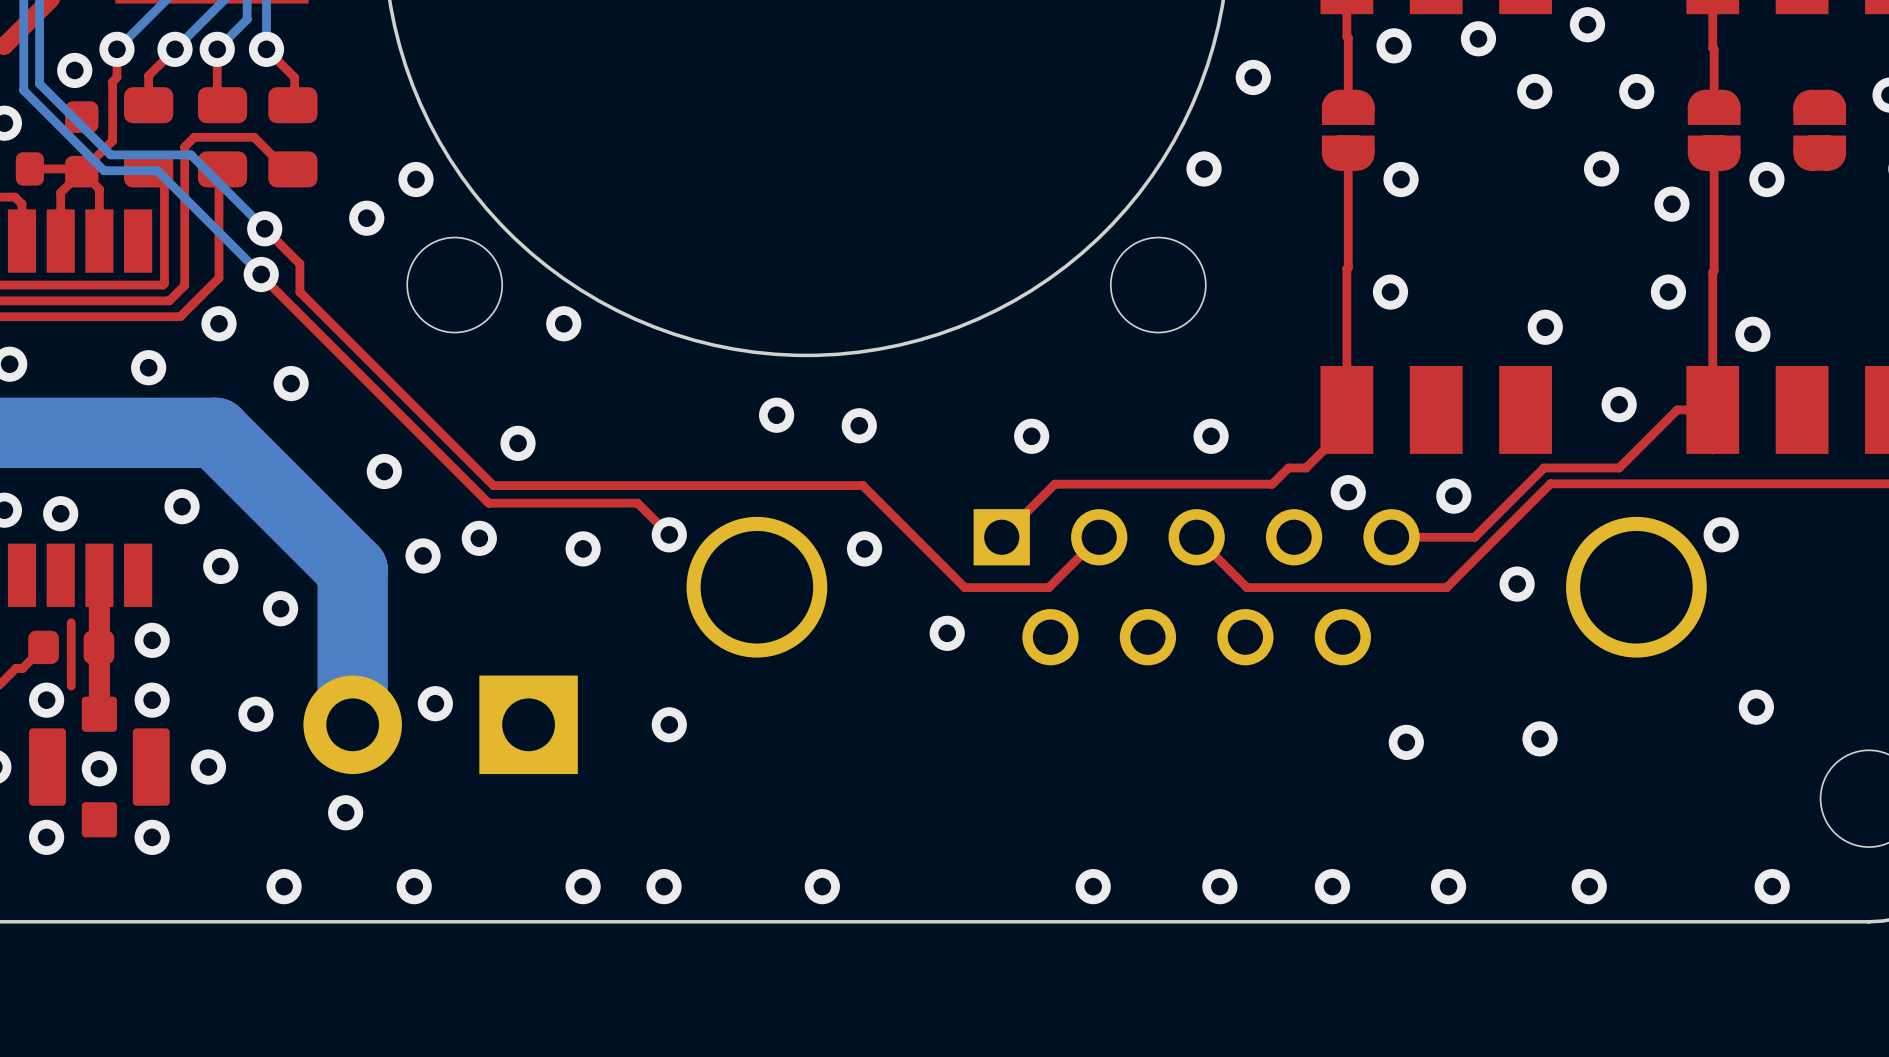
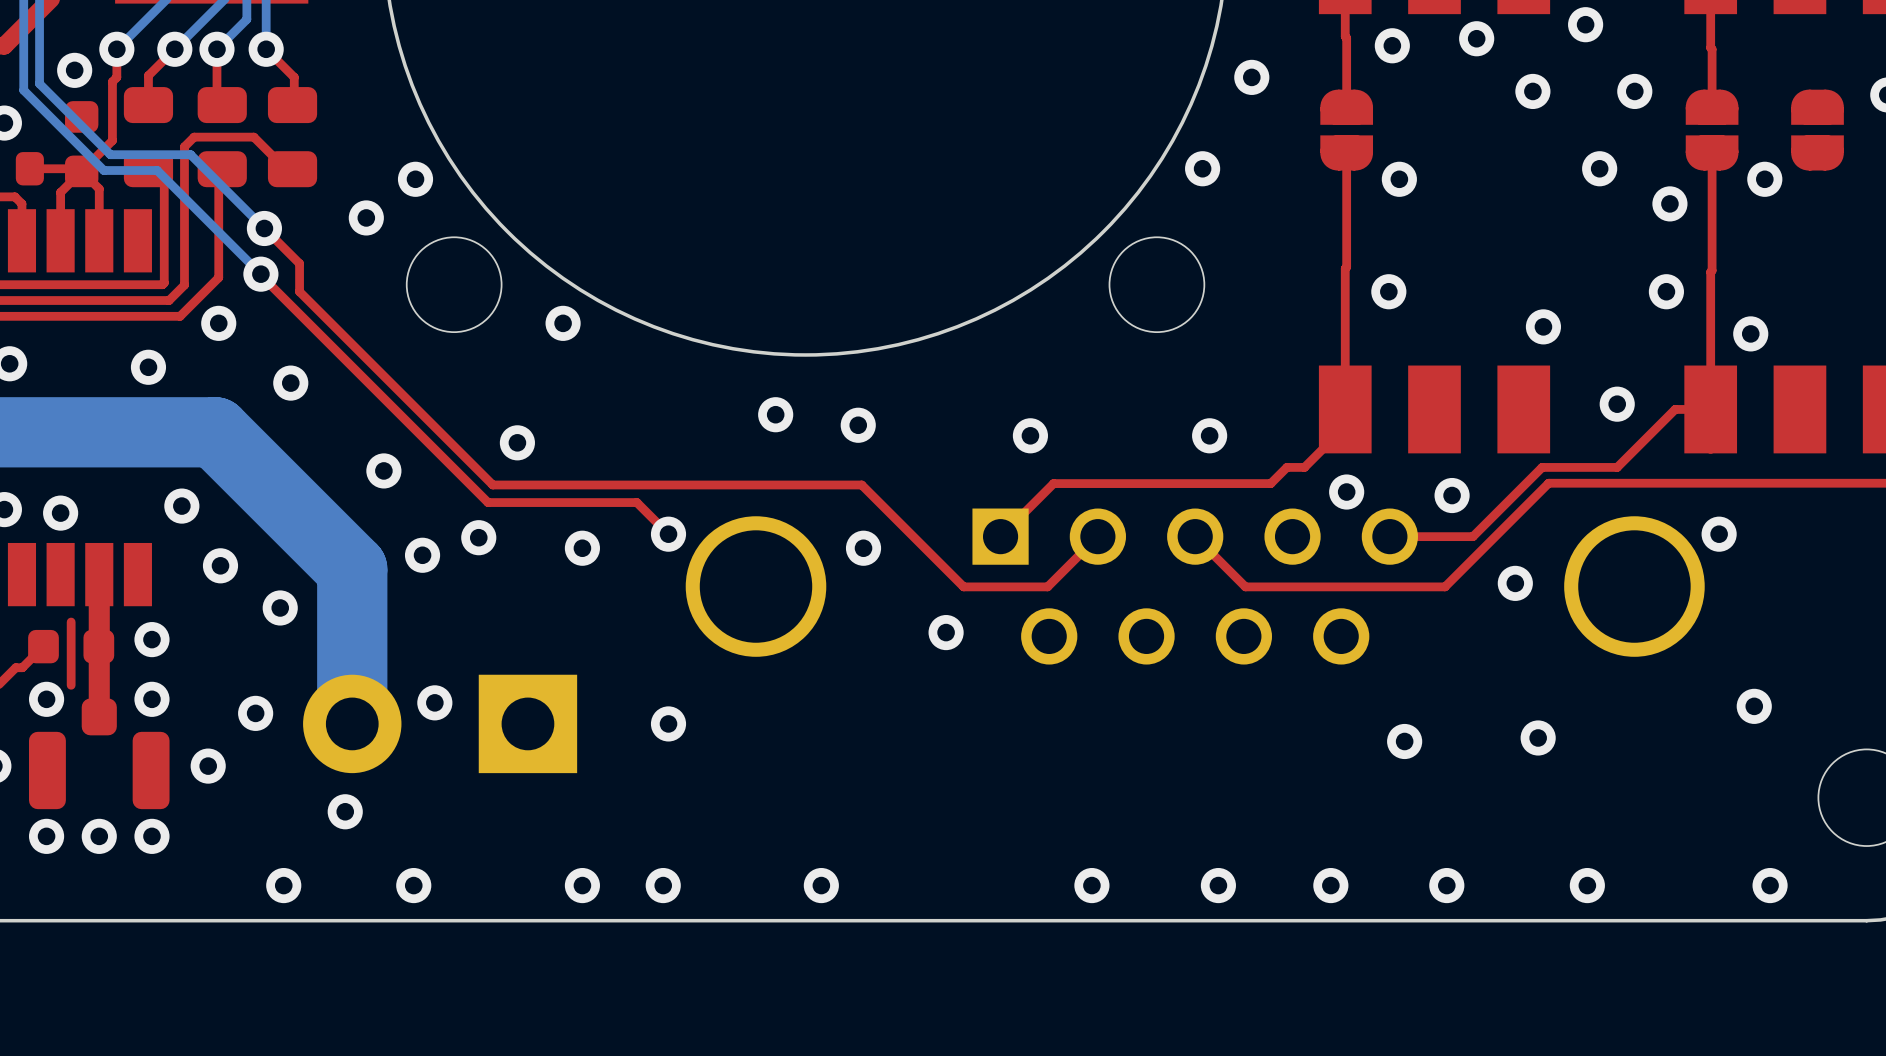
part footprint: [29, 696, 170, 838] -> [28, 698, 170, 810]
via position: (99, 768) -> (99, 836)

